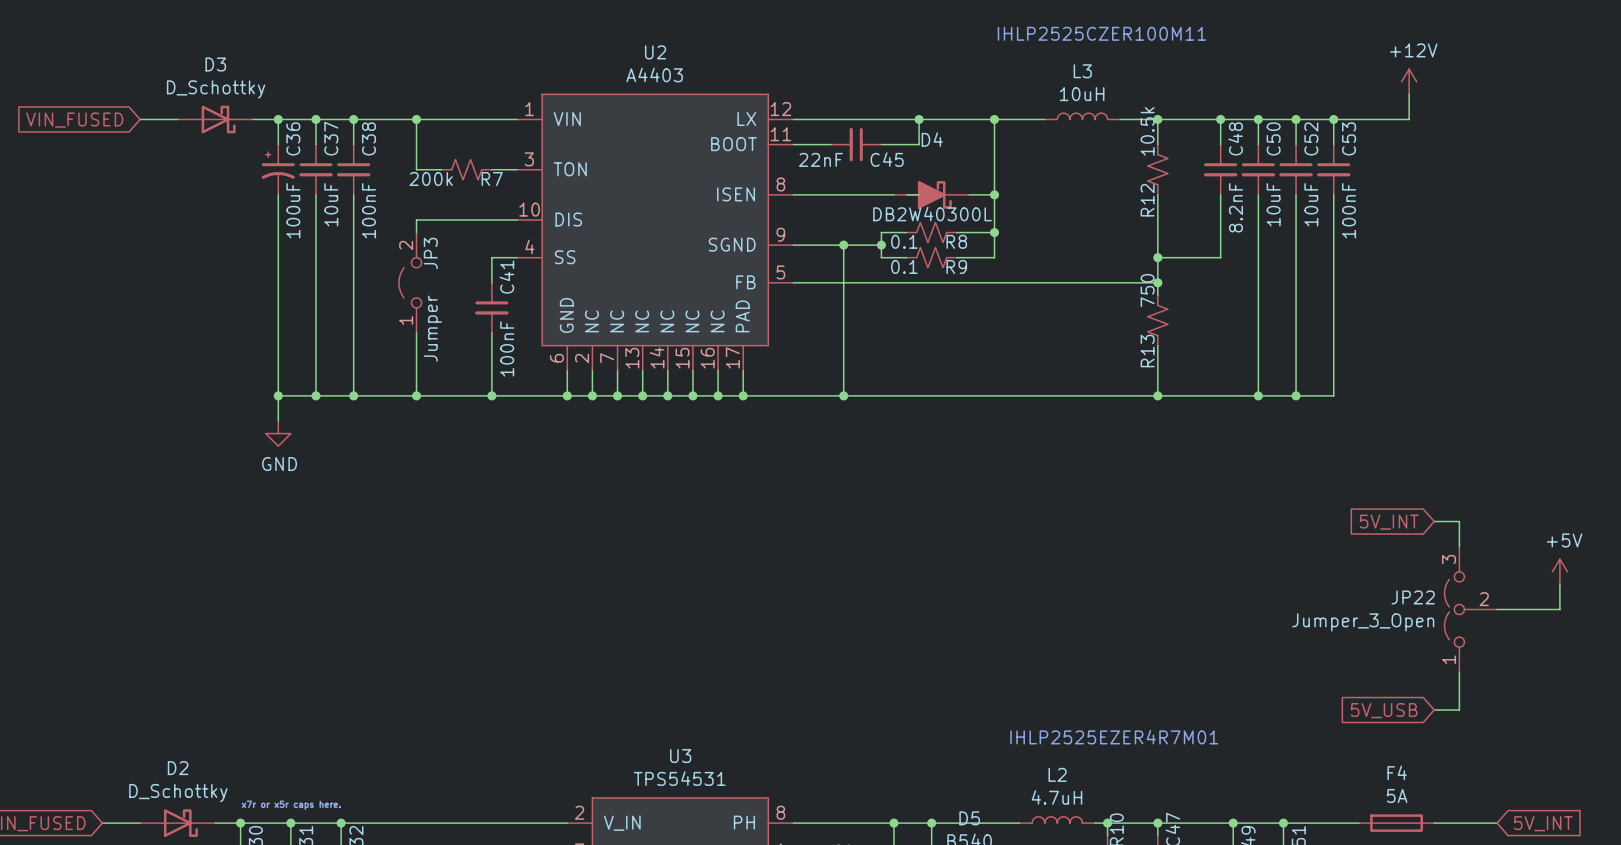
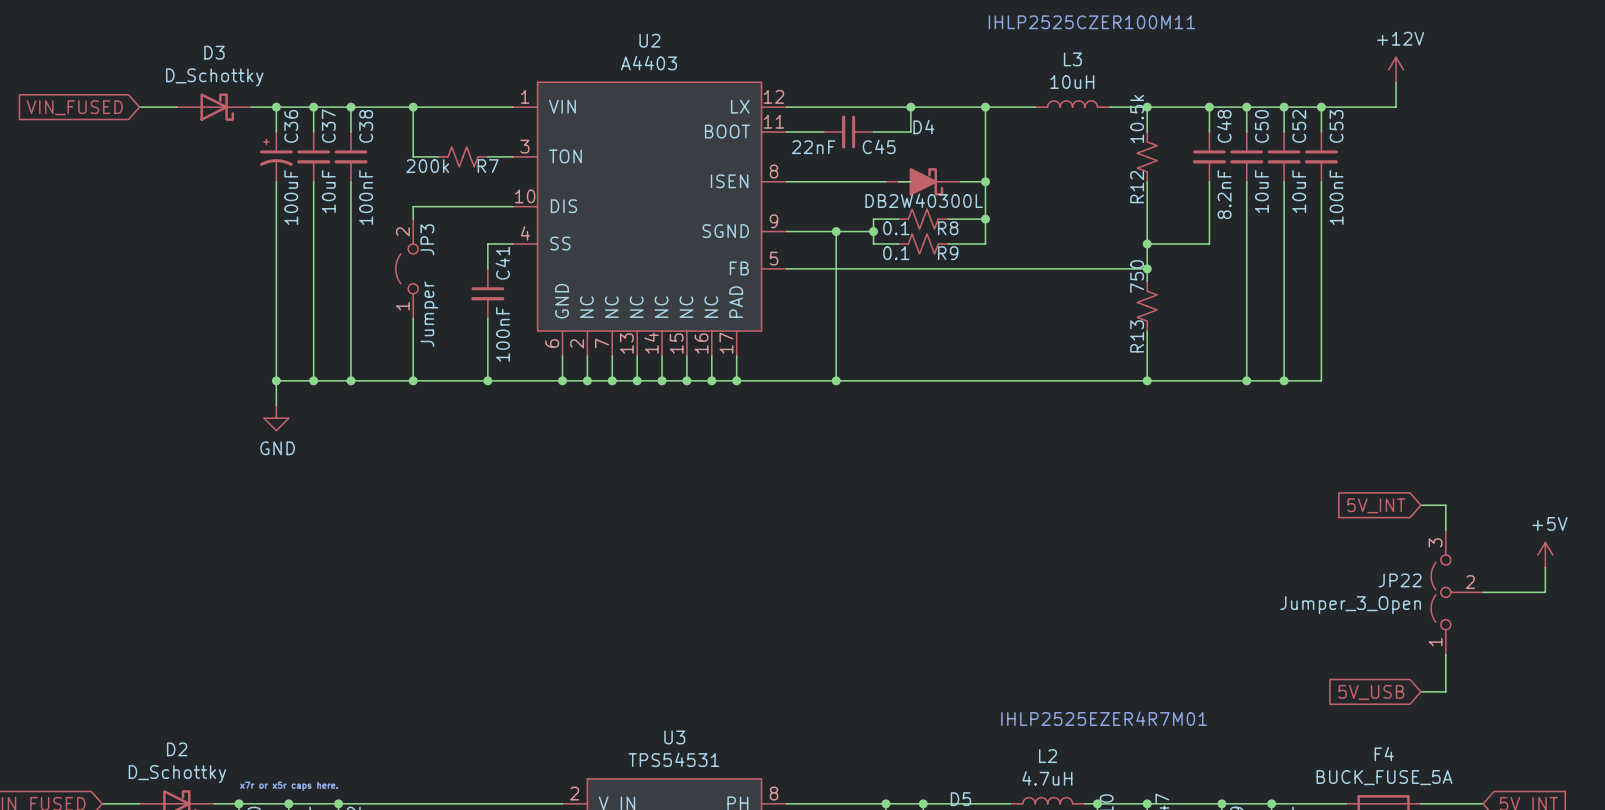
F4 value: 5A (1397, 795) -> BUCK_FUSE_5A (1384, 777)

